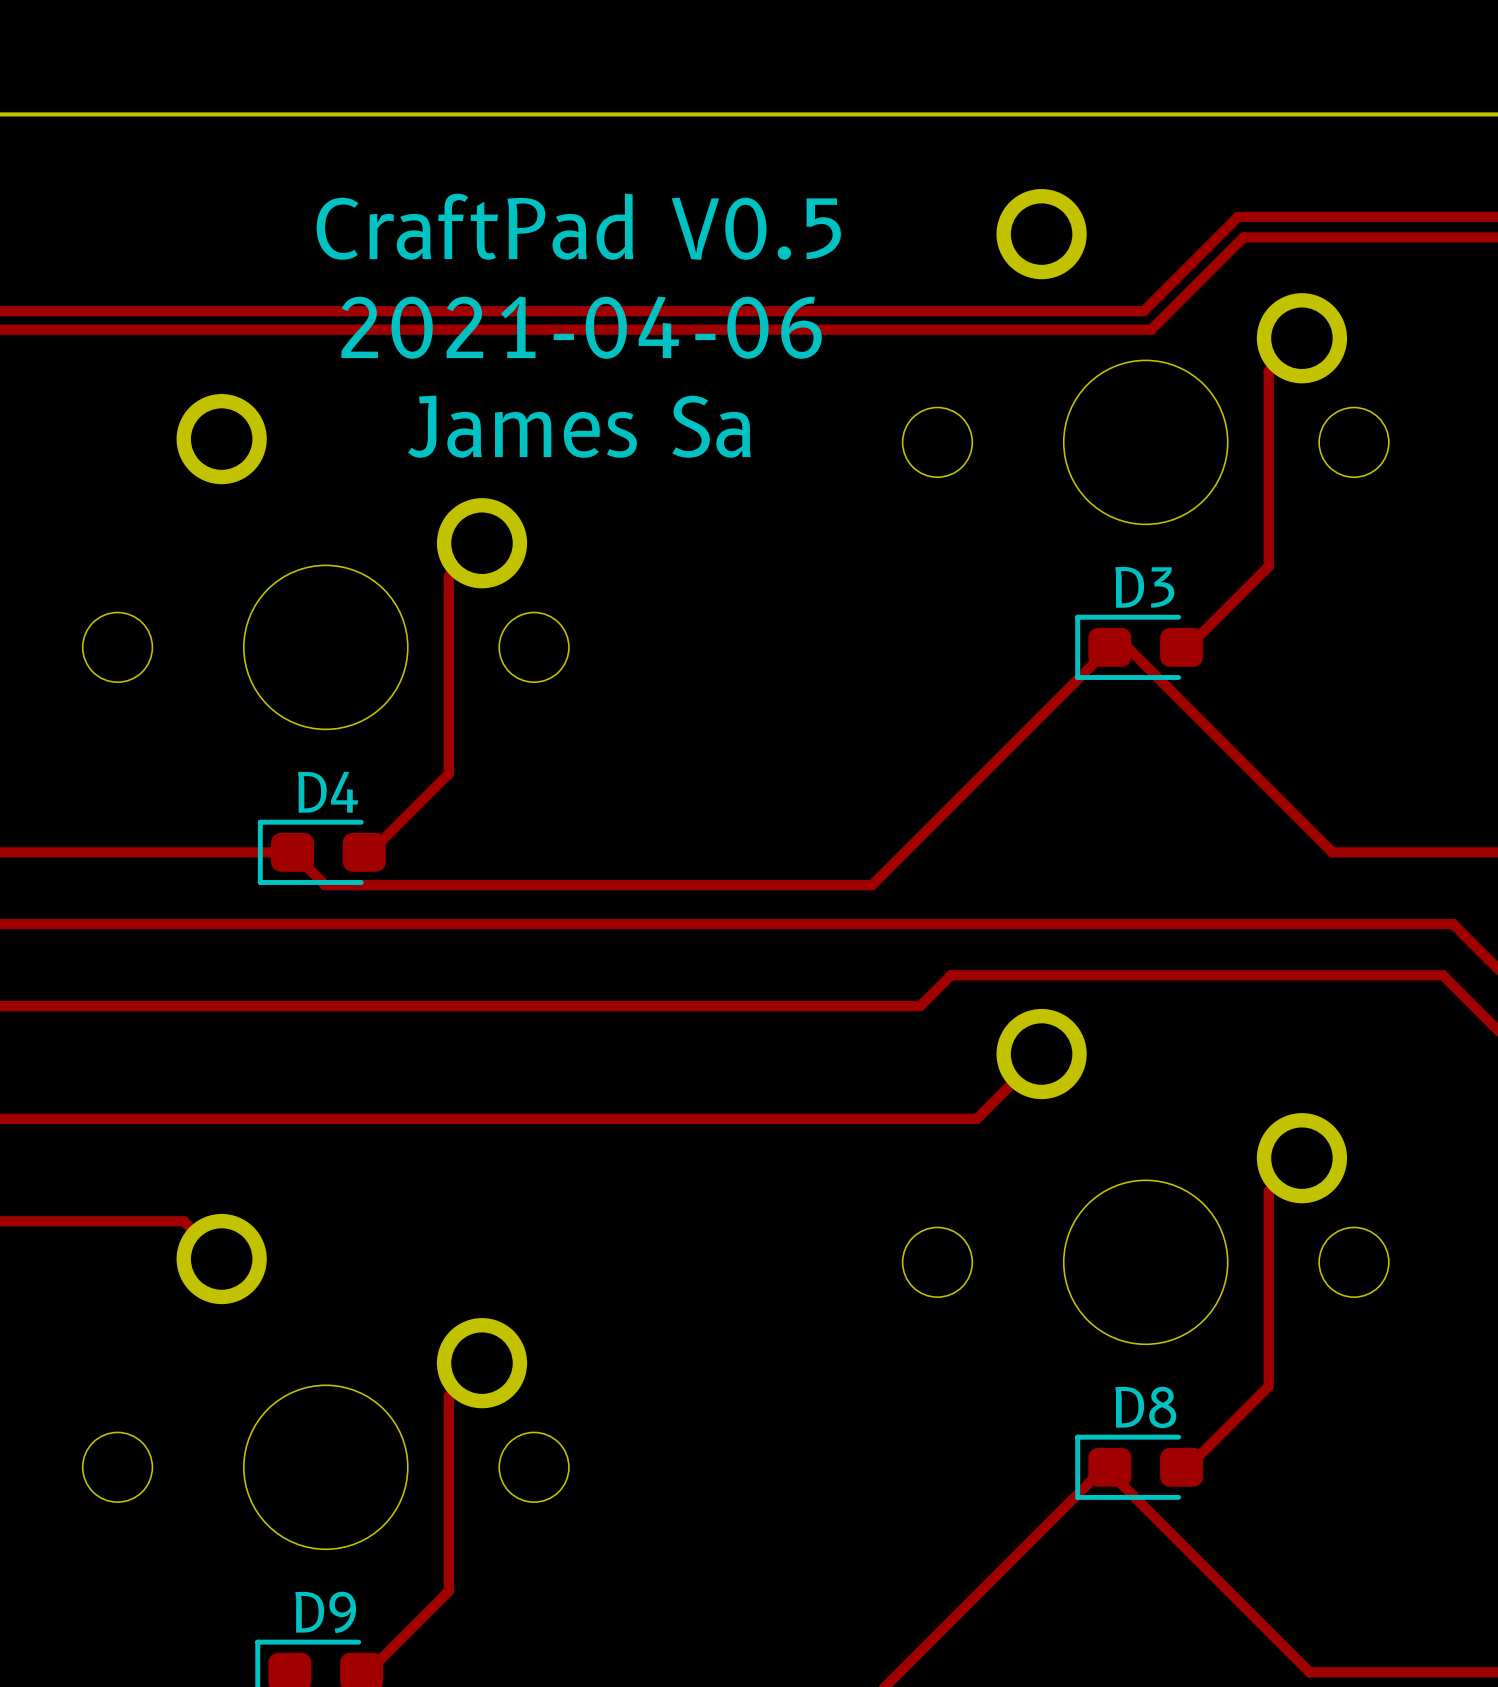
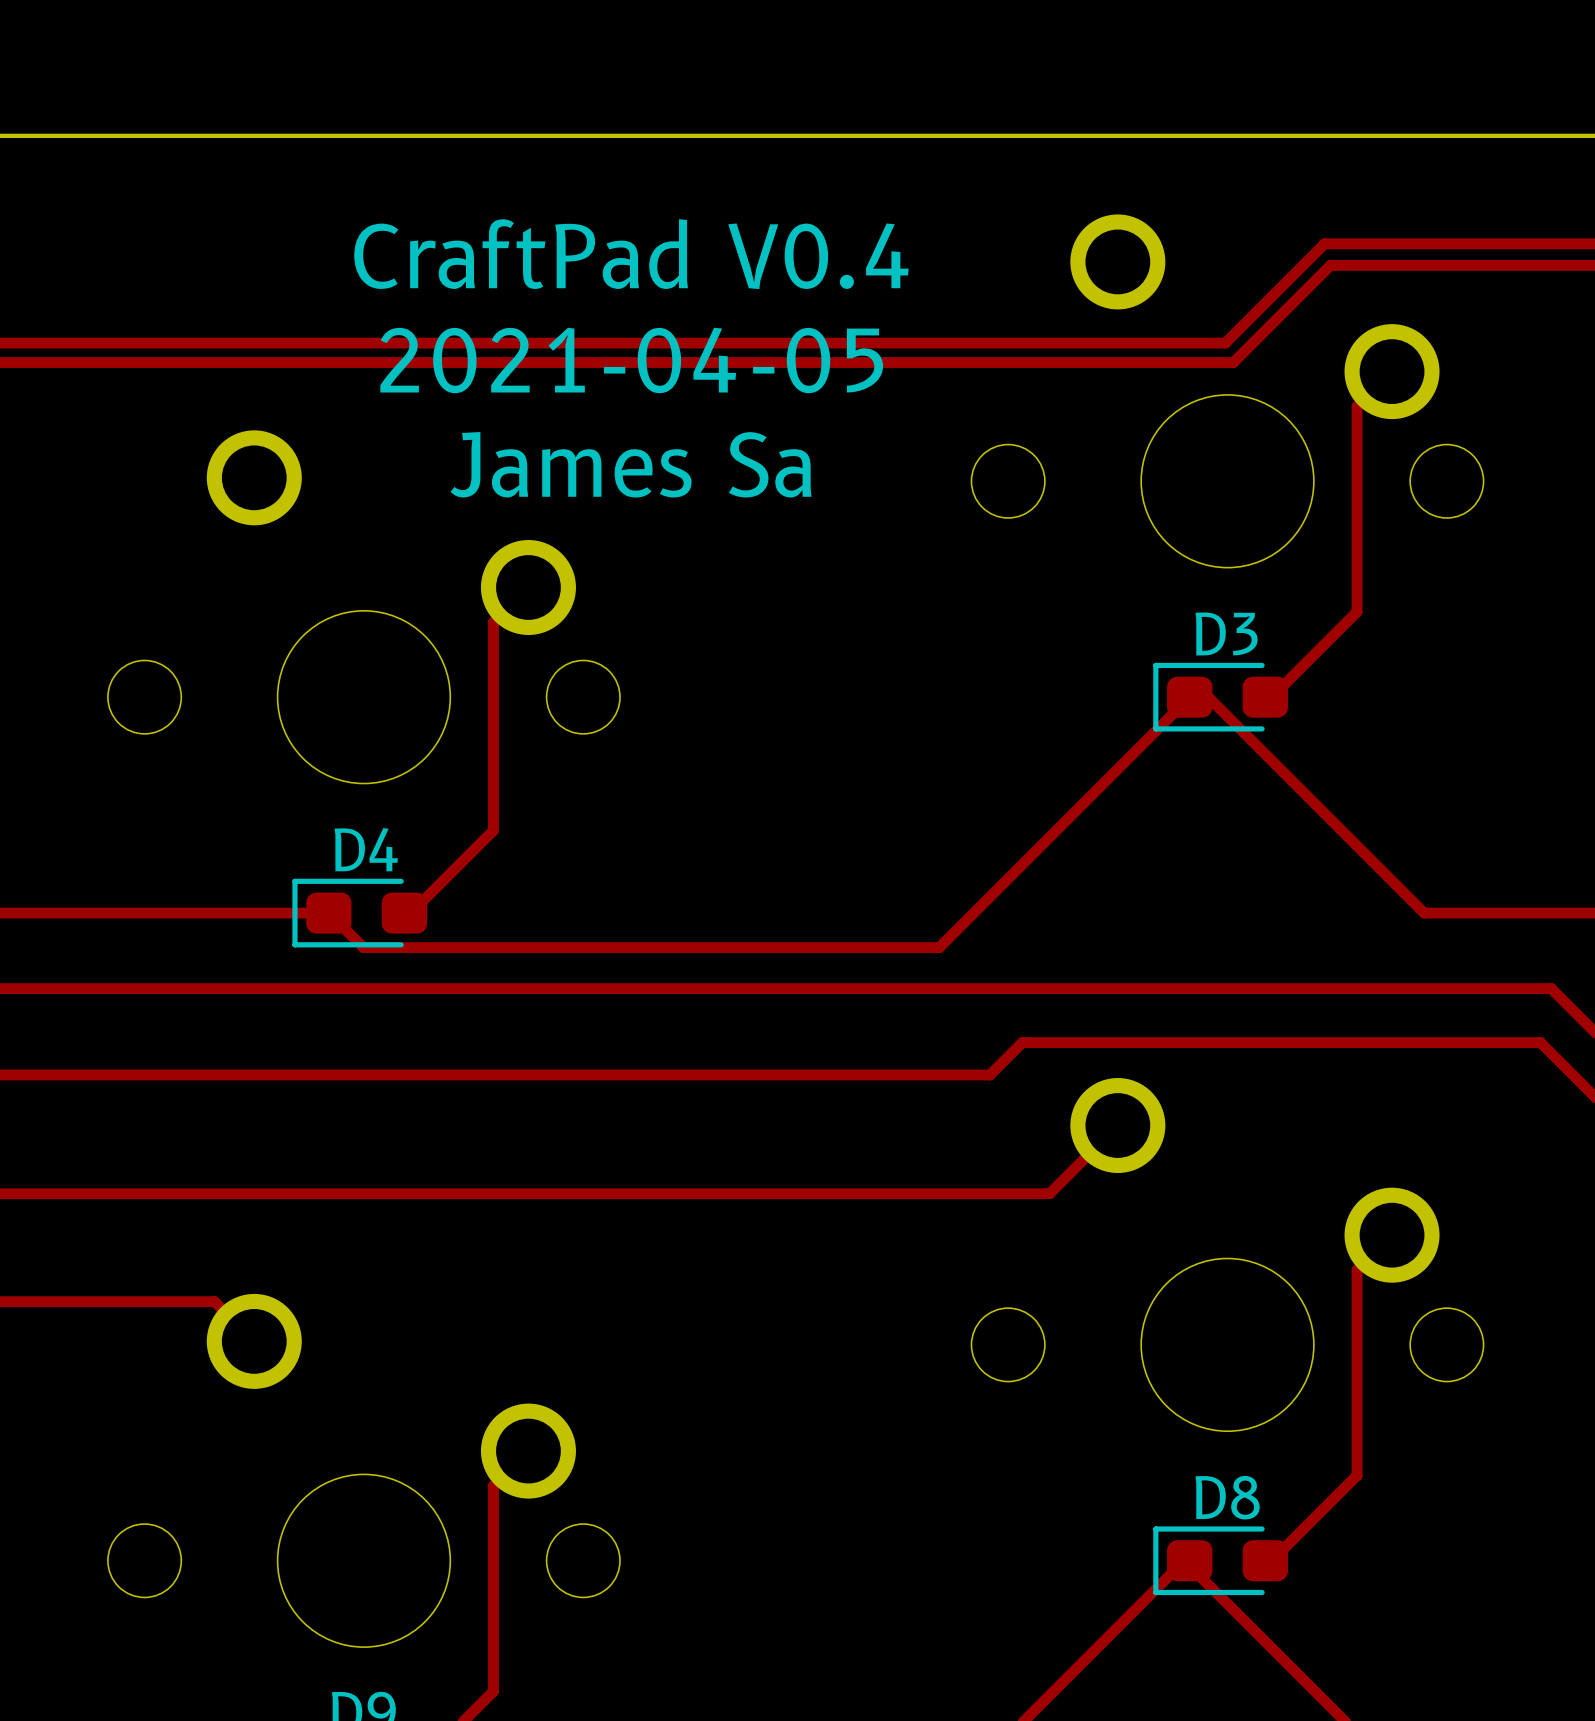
text: CraftPad V0.5 (578, 226) -> CraftPad V0.4 (631, 254)
text: 2021-04-06 (581, 327) -> 2021-04-05 (631, 360)

